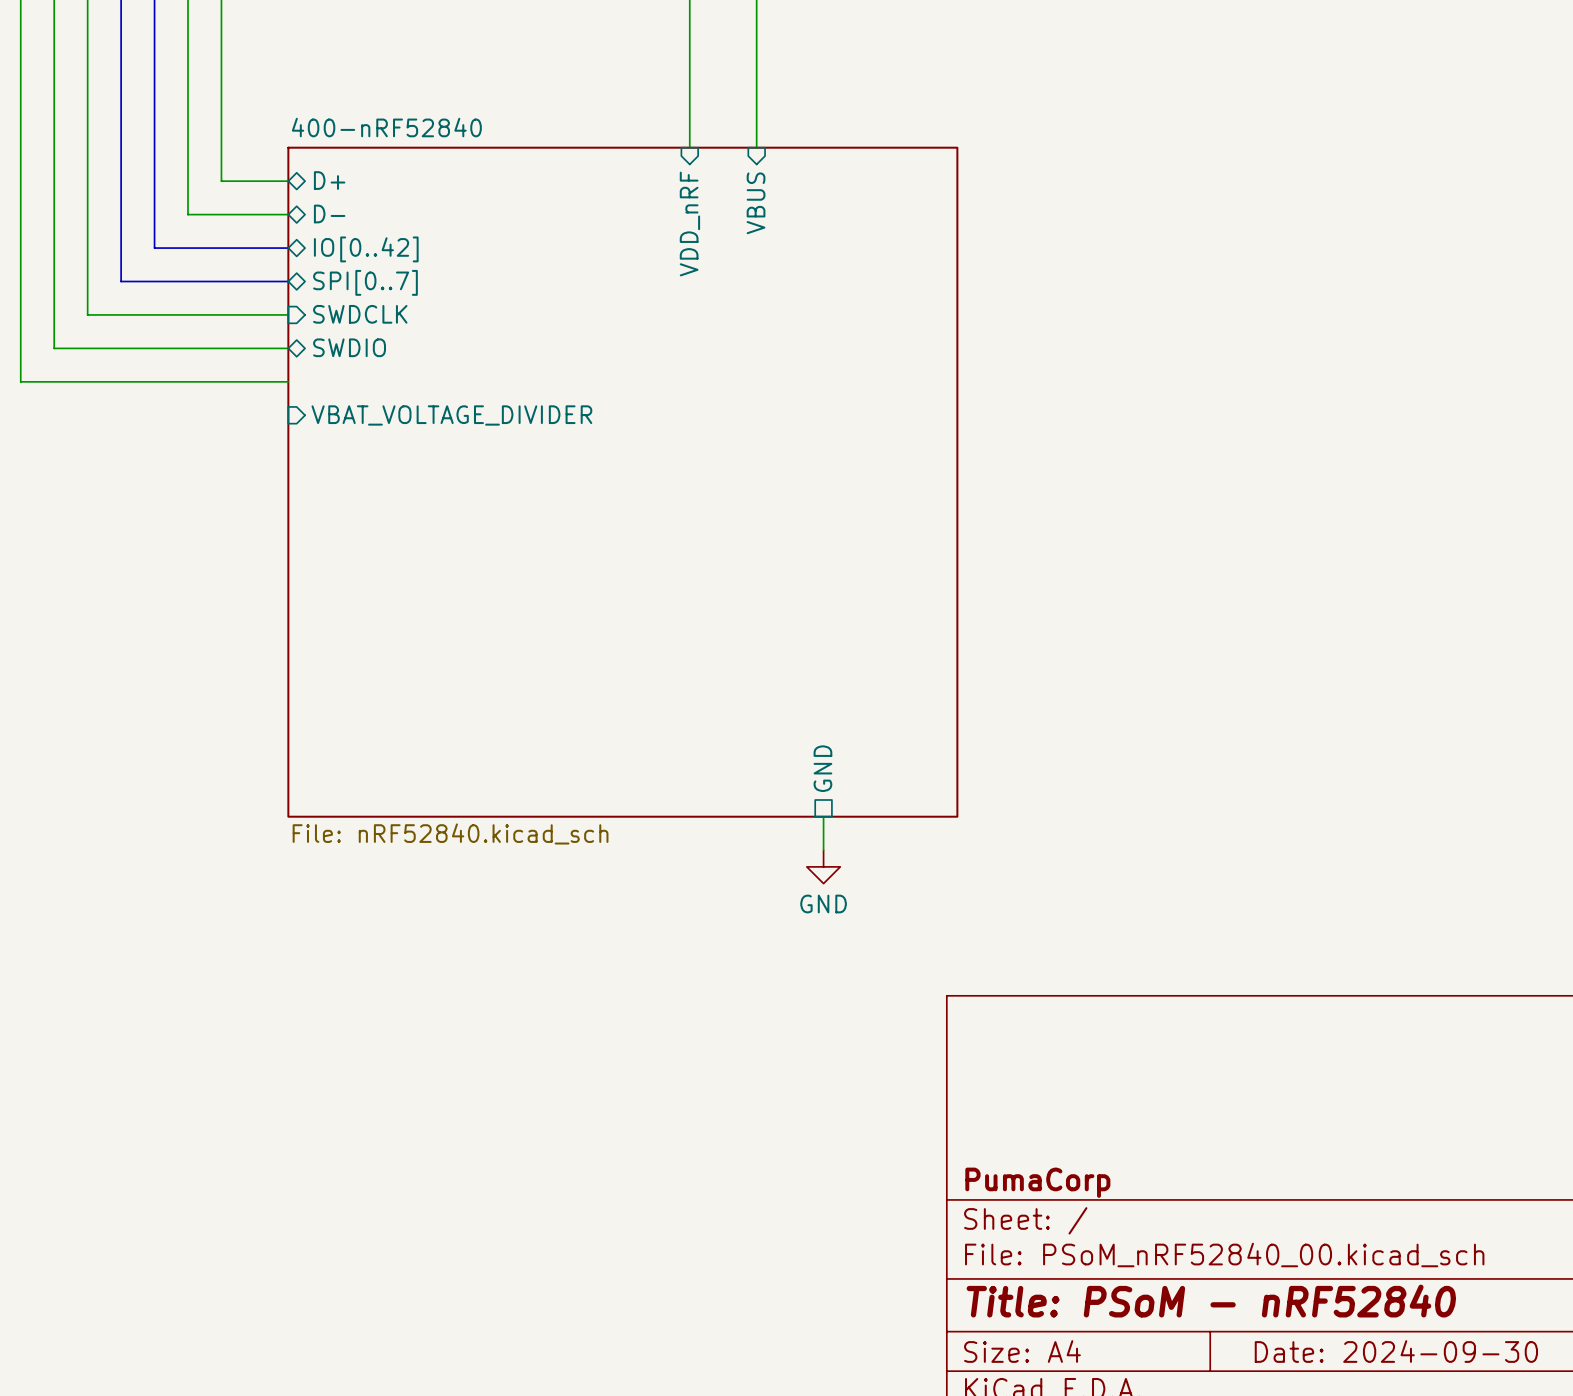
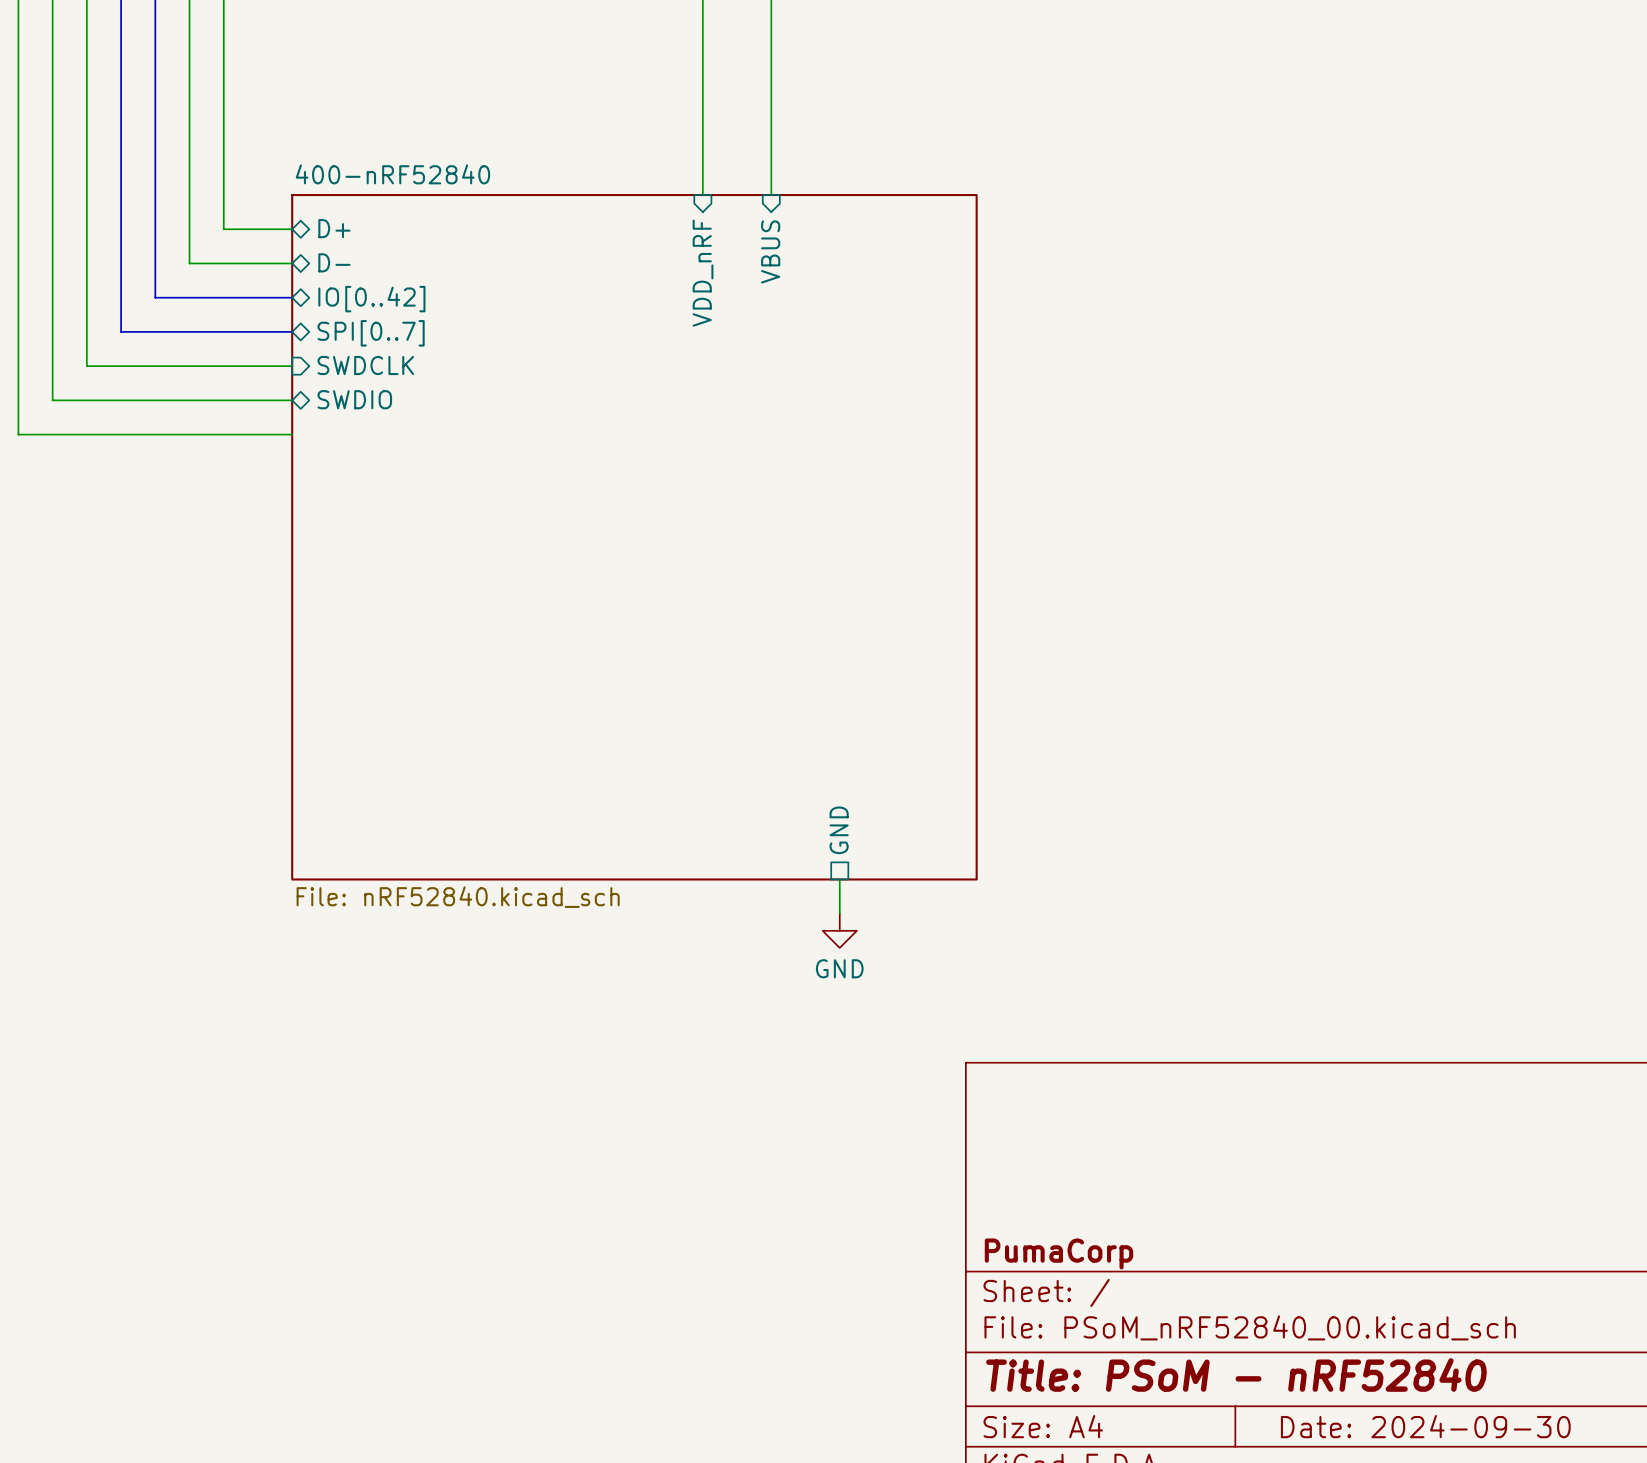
sheet pin: VBAT_VOLTAGE_DIVIDER (451, 415) -> none

